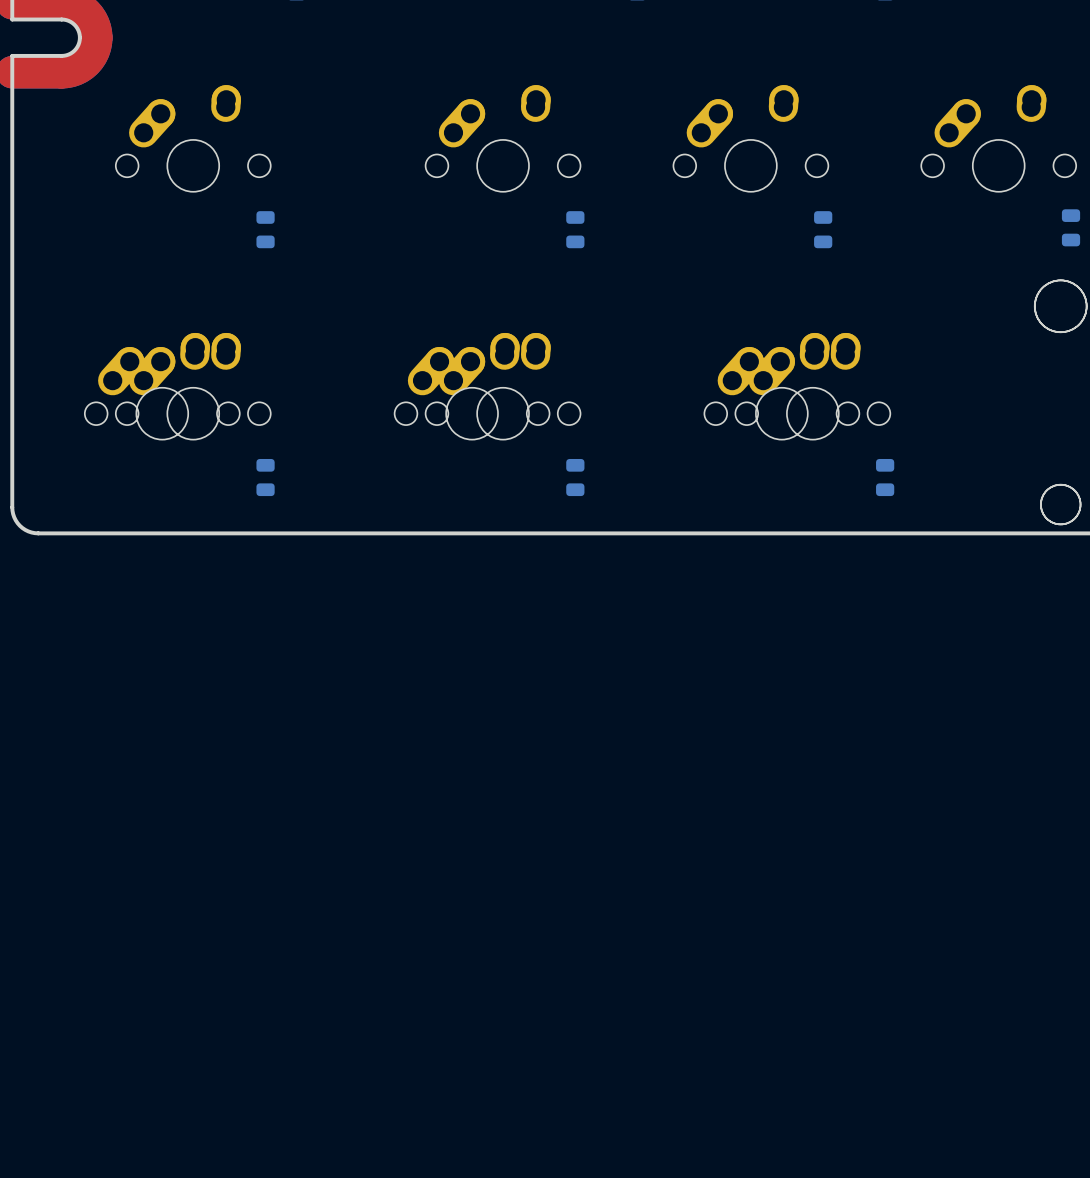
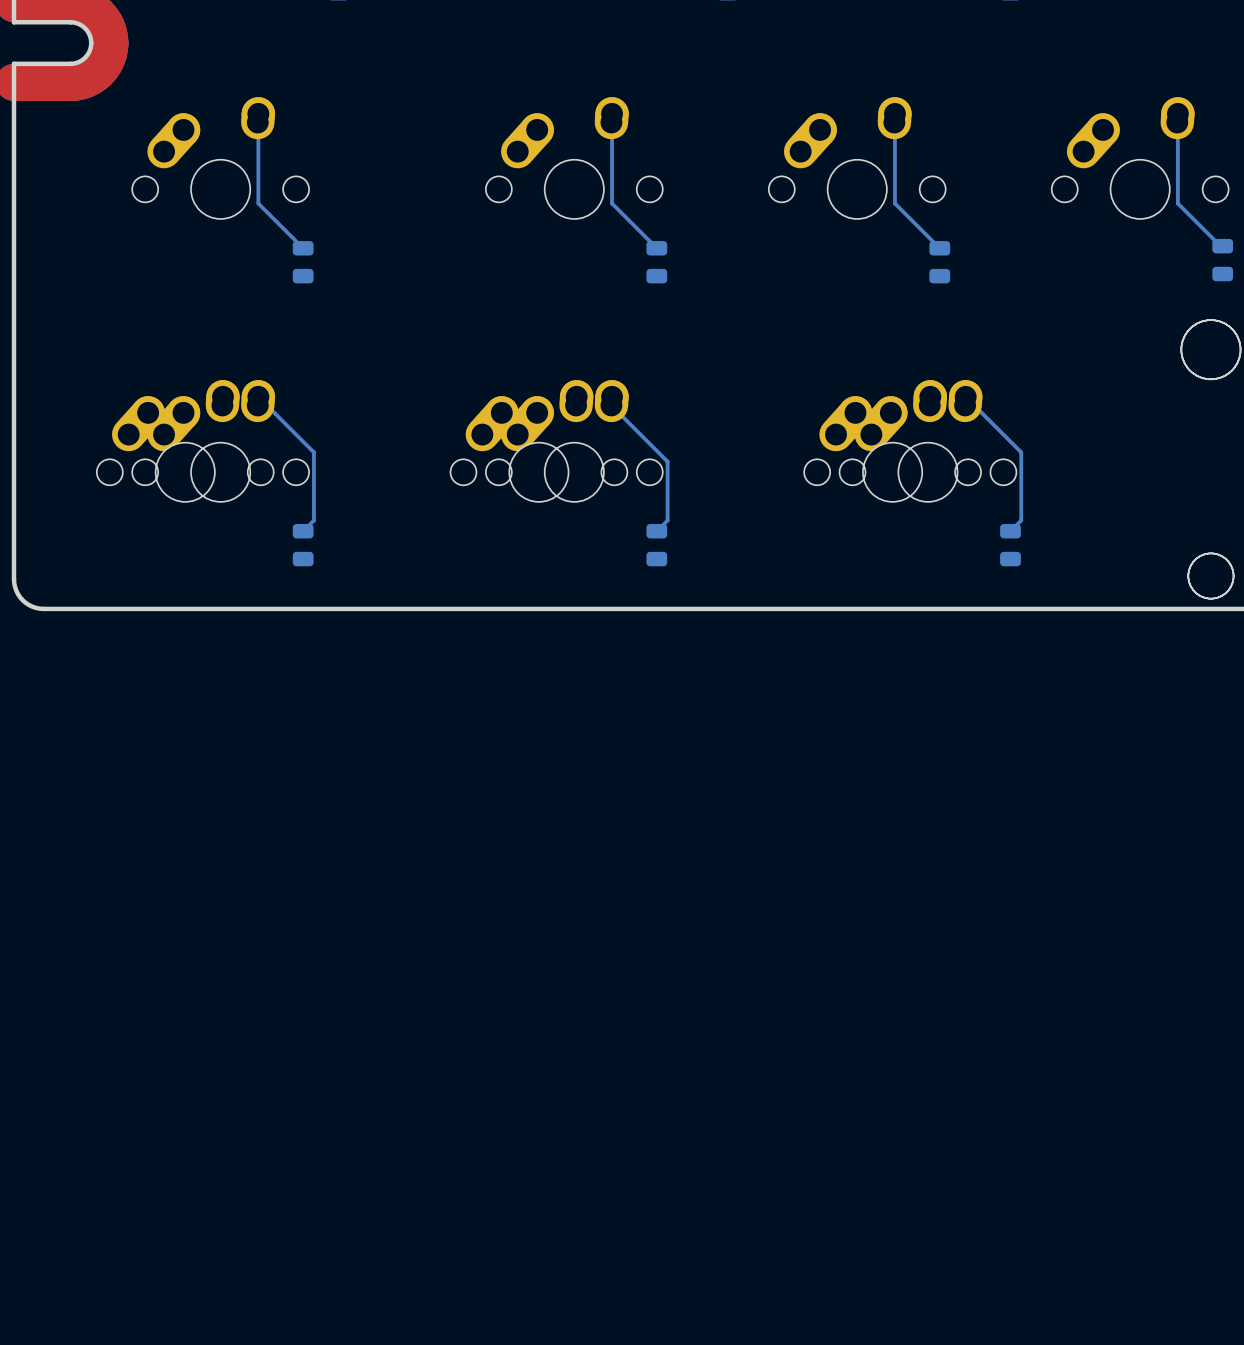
bottom track: none -> (1177, 113) (1177, 203) (1222, 248)
bottom track: none -> (257, 122) (258, 203) (303, 248)
bottom track: none -> (611, 122) (612, 203) (656, 248)
bottom track: none -> (894, 122) (894, 203) (939, 248)
bottom track: none -> (258, 396) (313, 452) (313, 520) (303, 531)
bottom track: none -> (965, 396) (1021, 452) (1021, 520) (1010, 531)
bottom track: none -> (611, 405) (667, 461) (667, 520) (656, 531)

